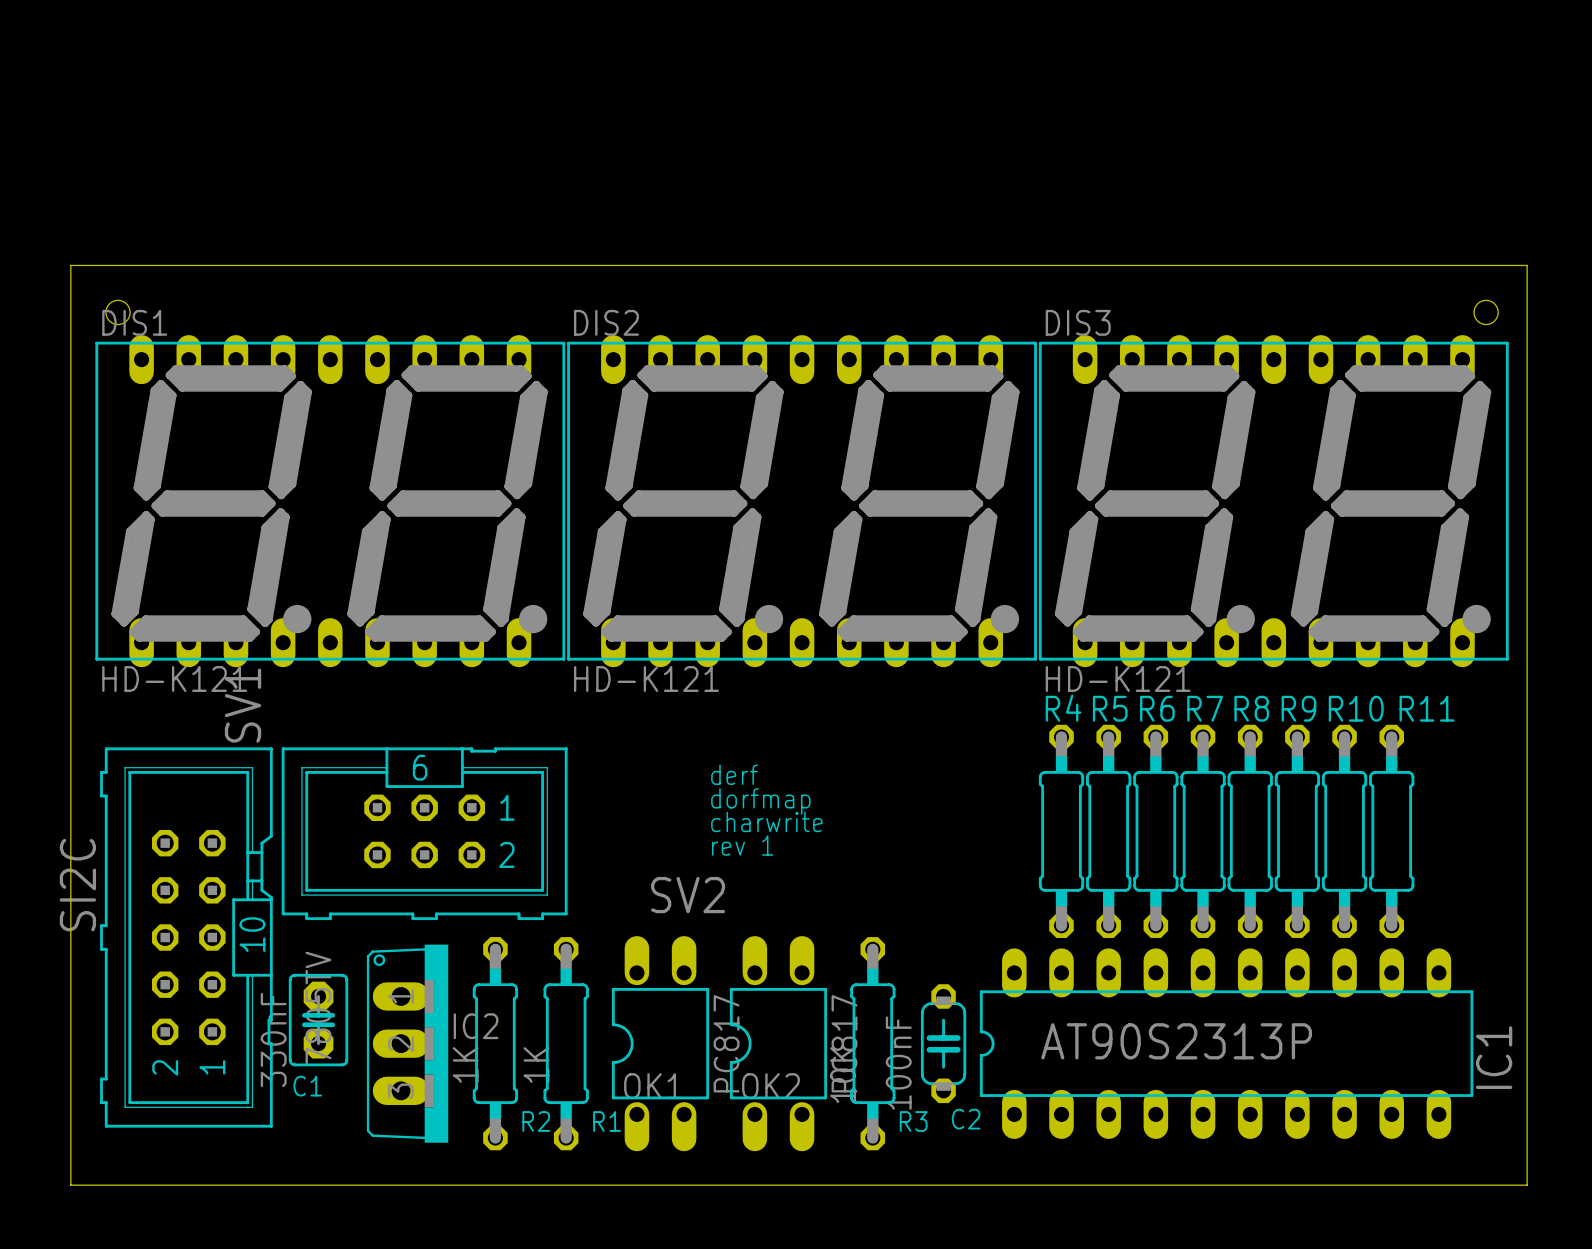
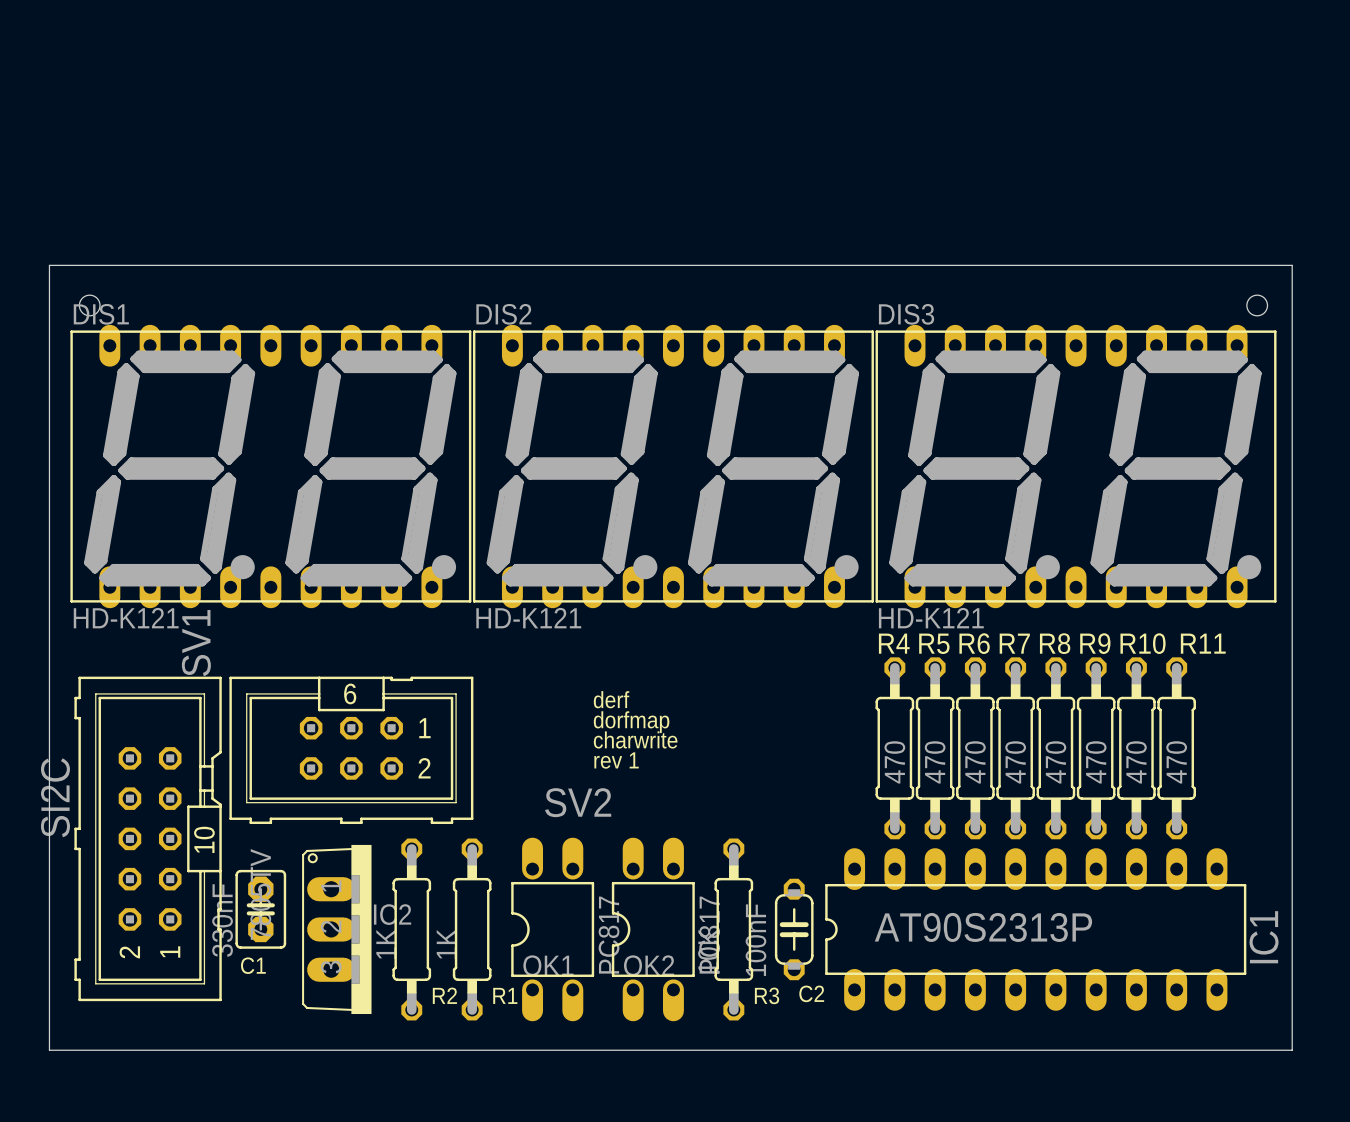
R4 value: none -> 470 (894, 762)
R5 value: none -> 470 (935, 762)
R6 value: none -> 470 (975, 762)
R7 value: none -> 470 (1015, 762)
R8 value: none -> 470 (1055, 762)
R9 value: none -> 470 (1096, 762)
R10 value: none -> 470 (1136, 762)
R11 value: none -> 470 (1176, 762)

